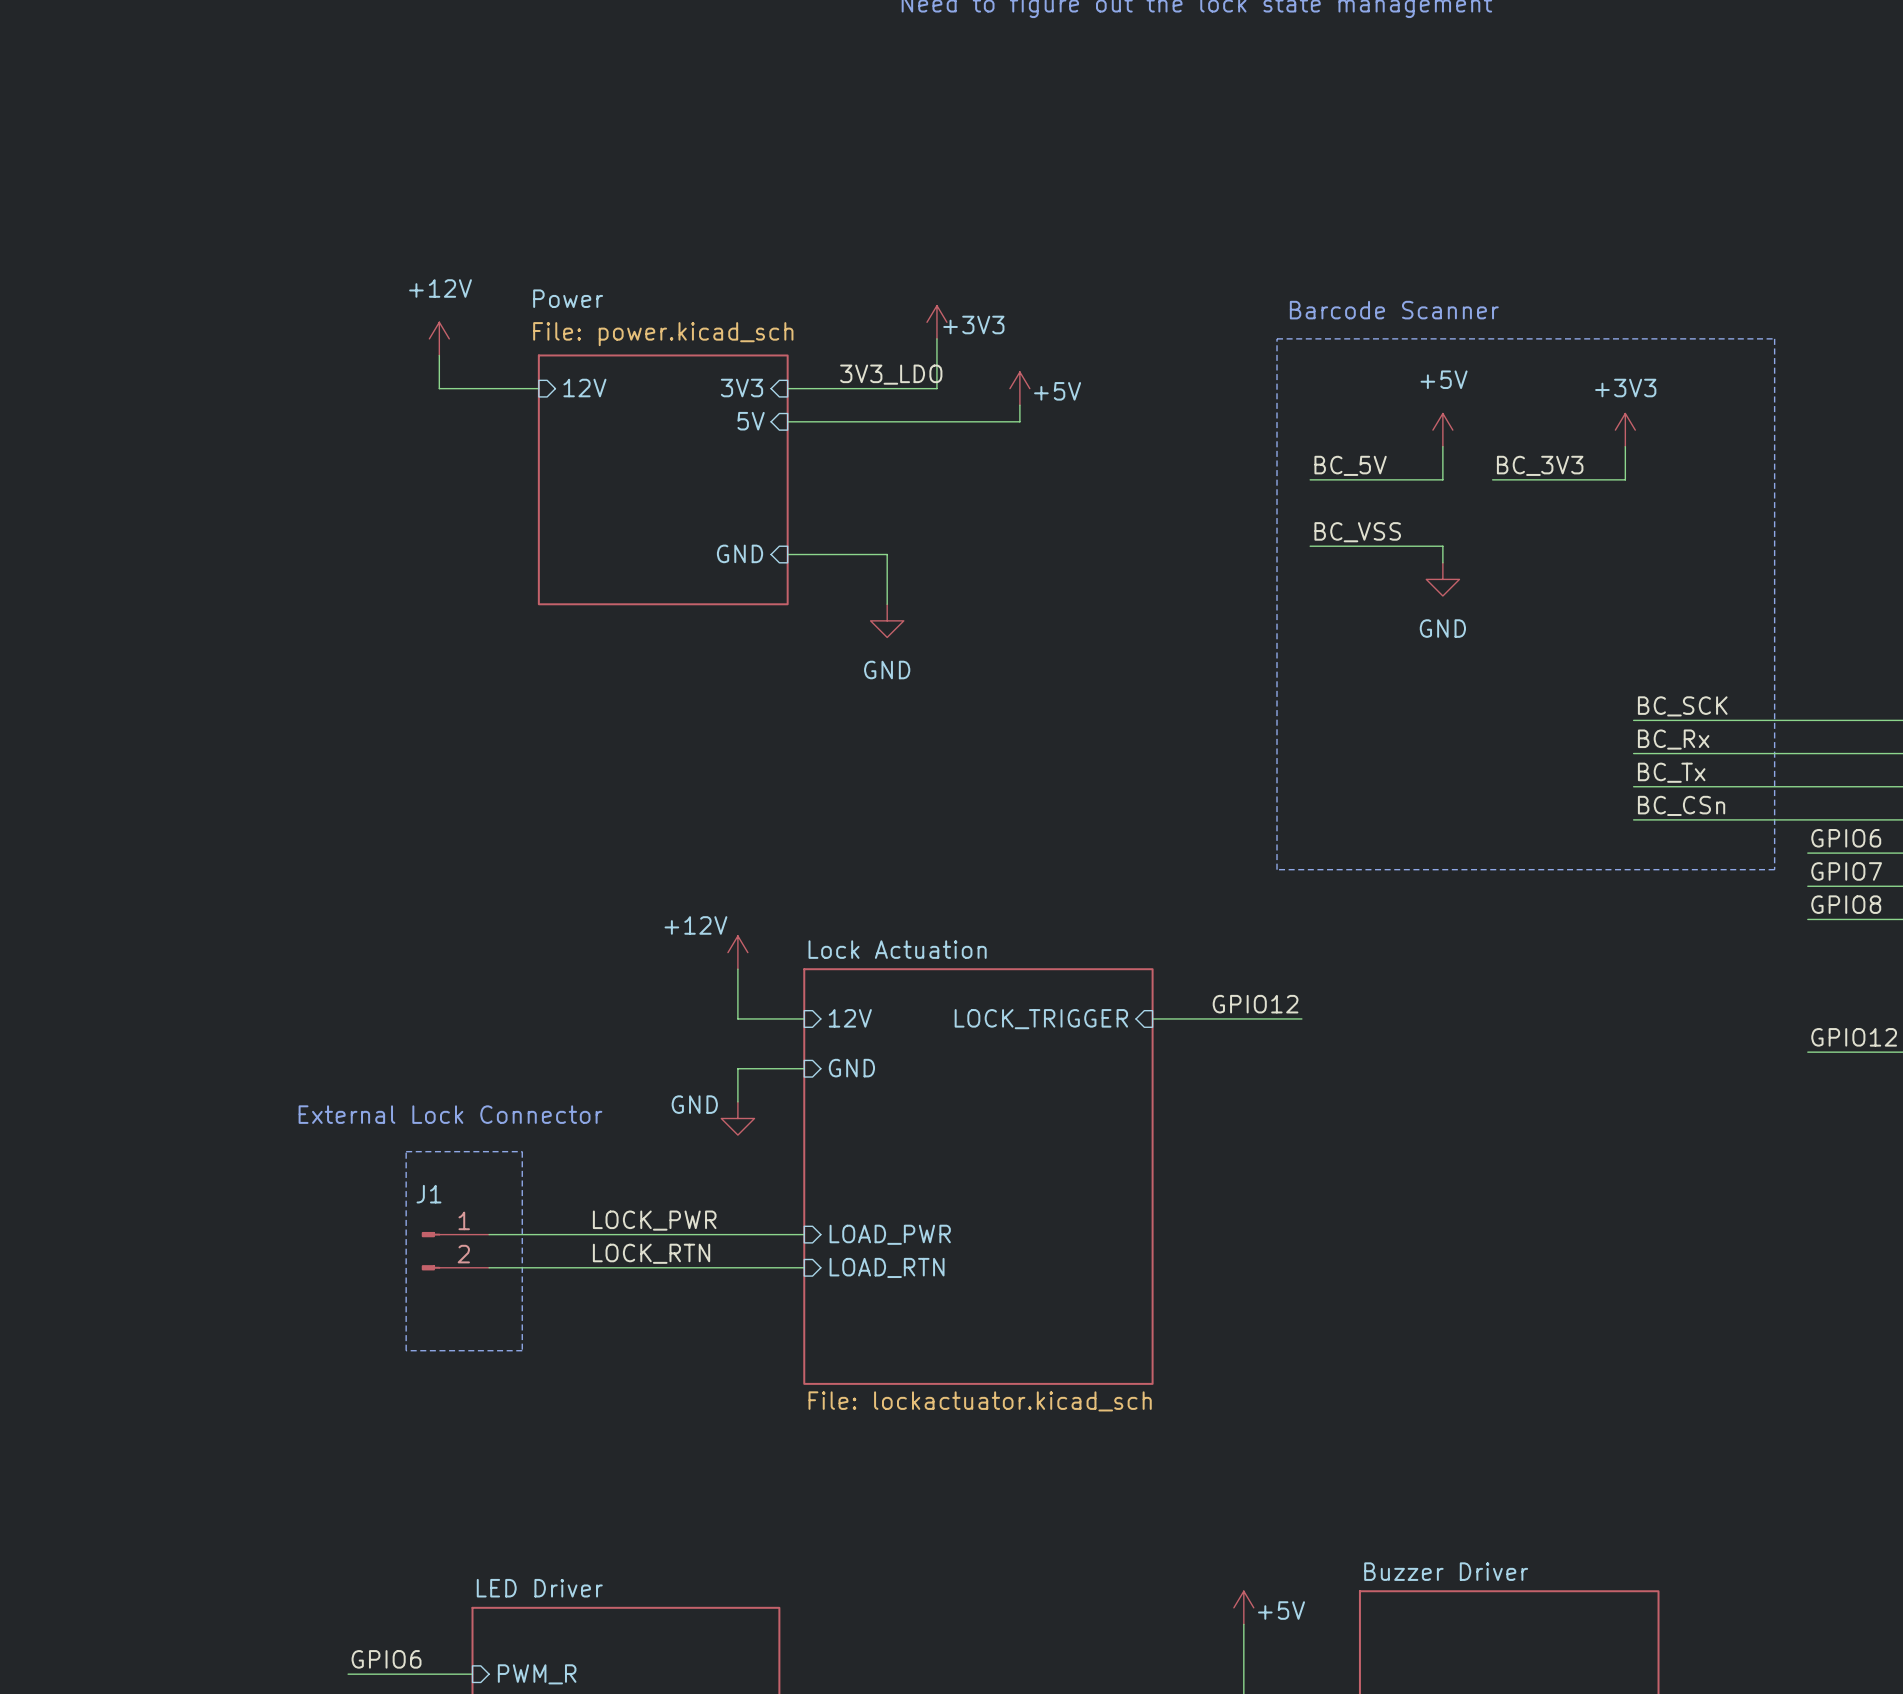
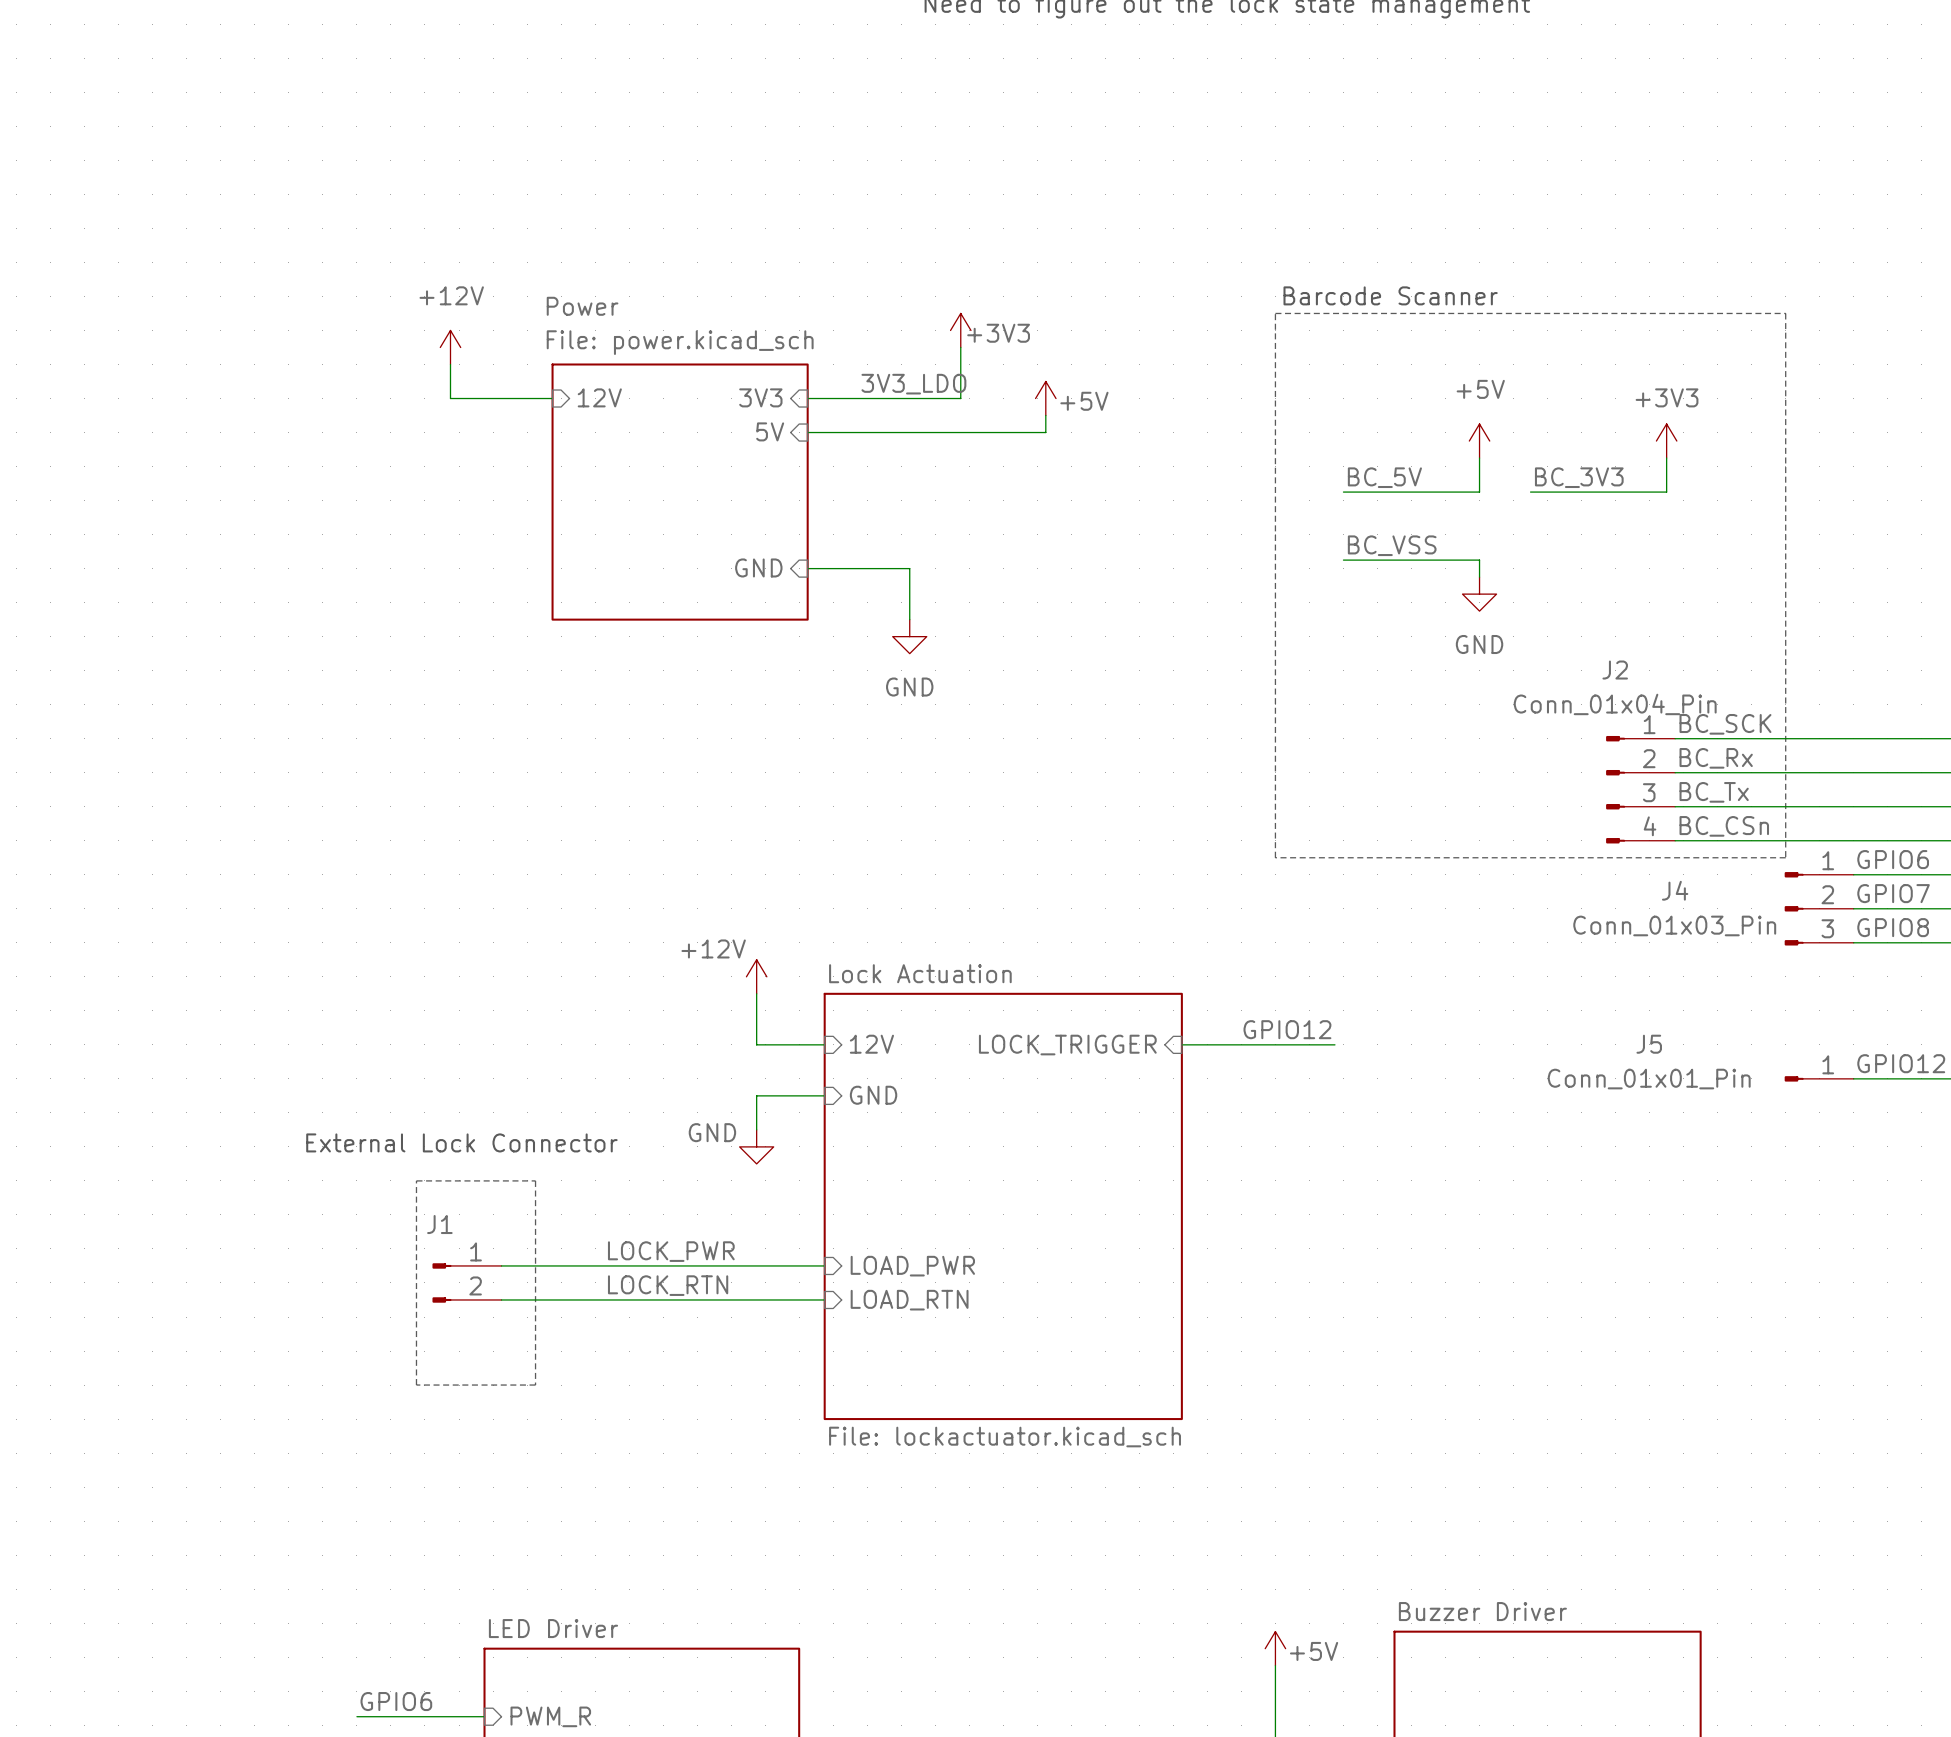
text position: Barcode Scanner (1394, 310) -> Barcode Scanner (1390, 295)
line: (1277, 338) (1774, 338) (1774, 869) (1277, 869) (1277, 338) -> (1275, 313) (1275, 857) (1785, 857) (1785, 313) (1275, 313)
J2: none -> Conn_01x04_Pin (1640, 789)
J4: none -> Conn_01x03_Pin (1819, 908)
J5: none -> Conn_01x01_Pin (1819, 1078)

